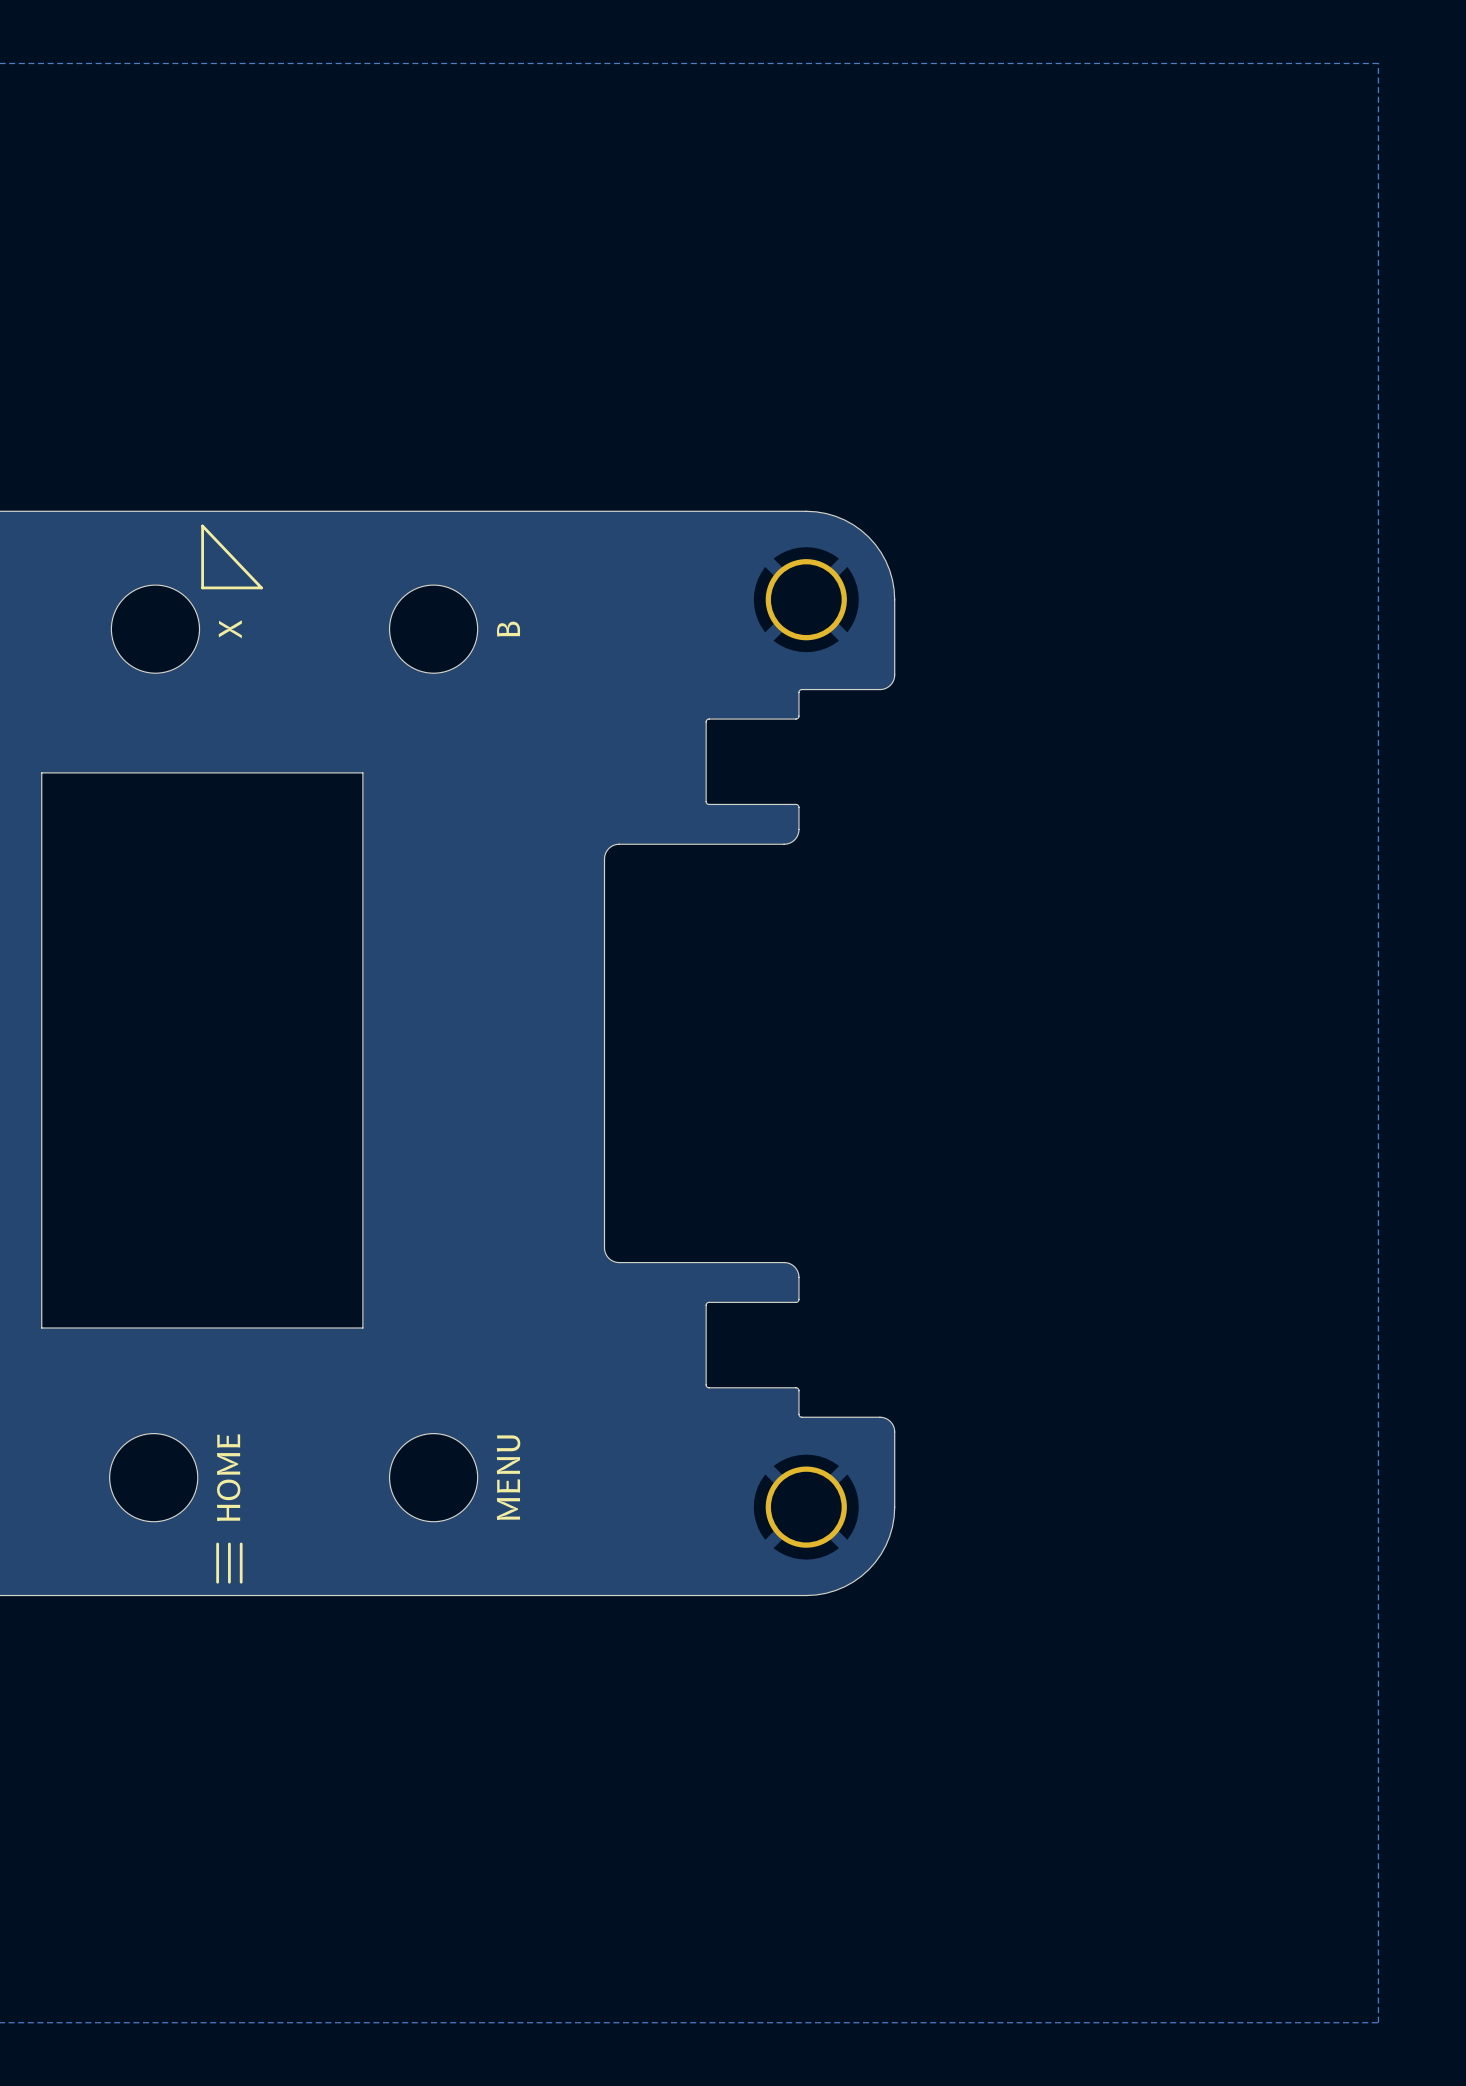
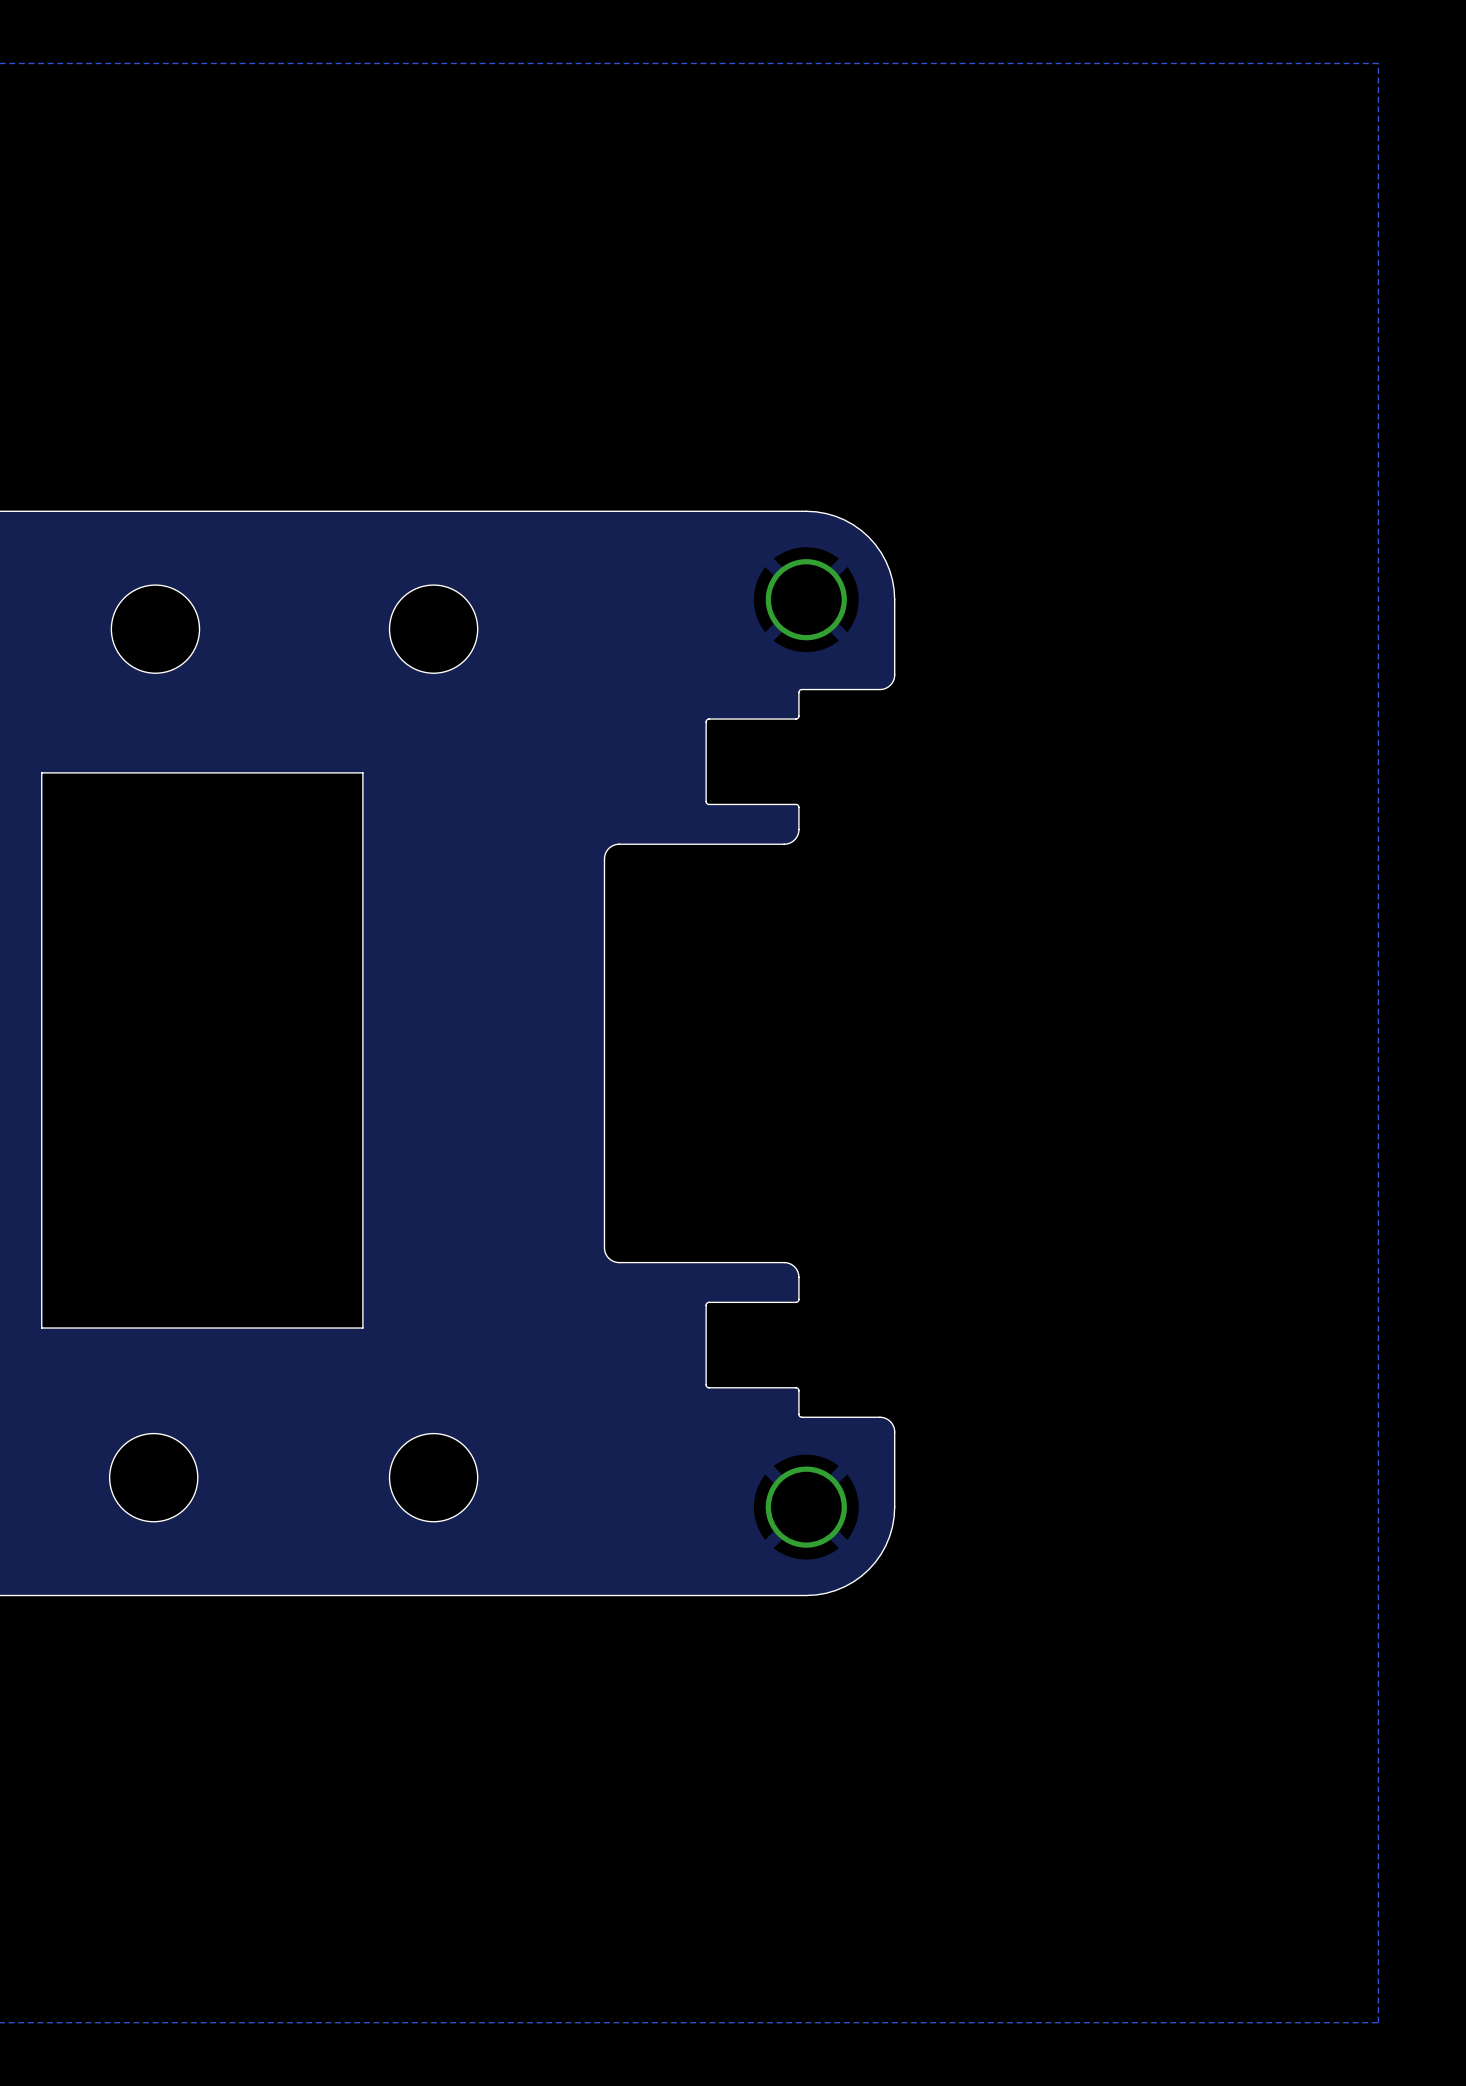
line: (202, 526) (202, 587) (261, 587) (202, 526) -> none
text: X (230, 629) -> none
text: B (508, 629) -> none
text: HOME (228, 1477) -> none
text: MENU (508, 1477) -> none
line: (217, 1543) (217, 1582) -> none
line: (229, 1543) (229, 1582) -> none
line: (241, 1543) (241, 1582) -> none

